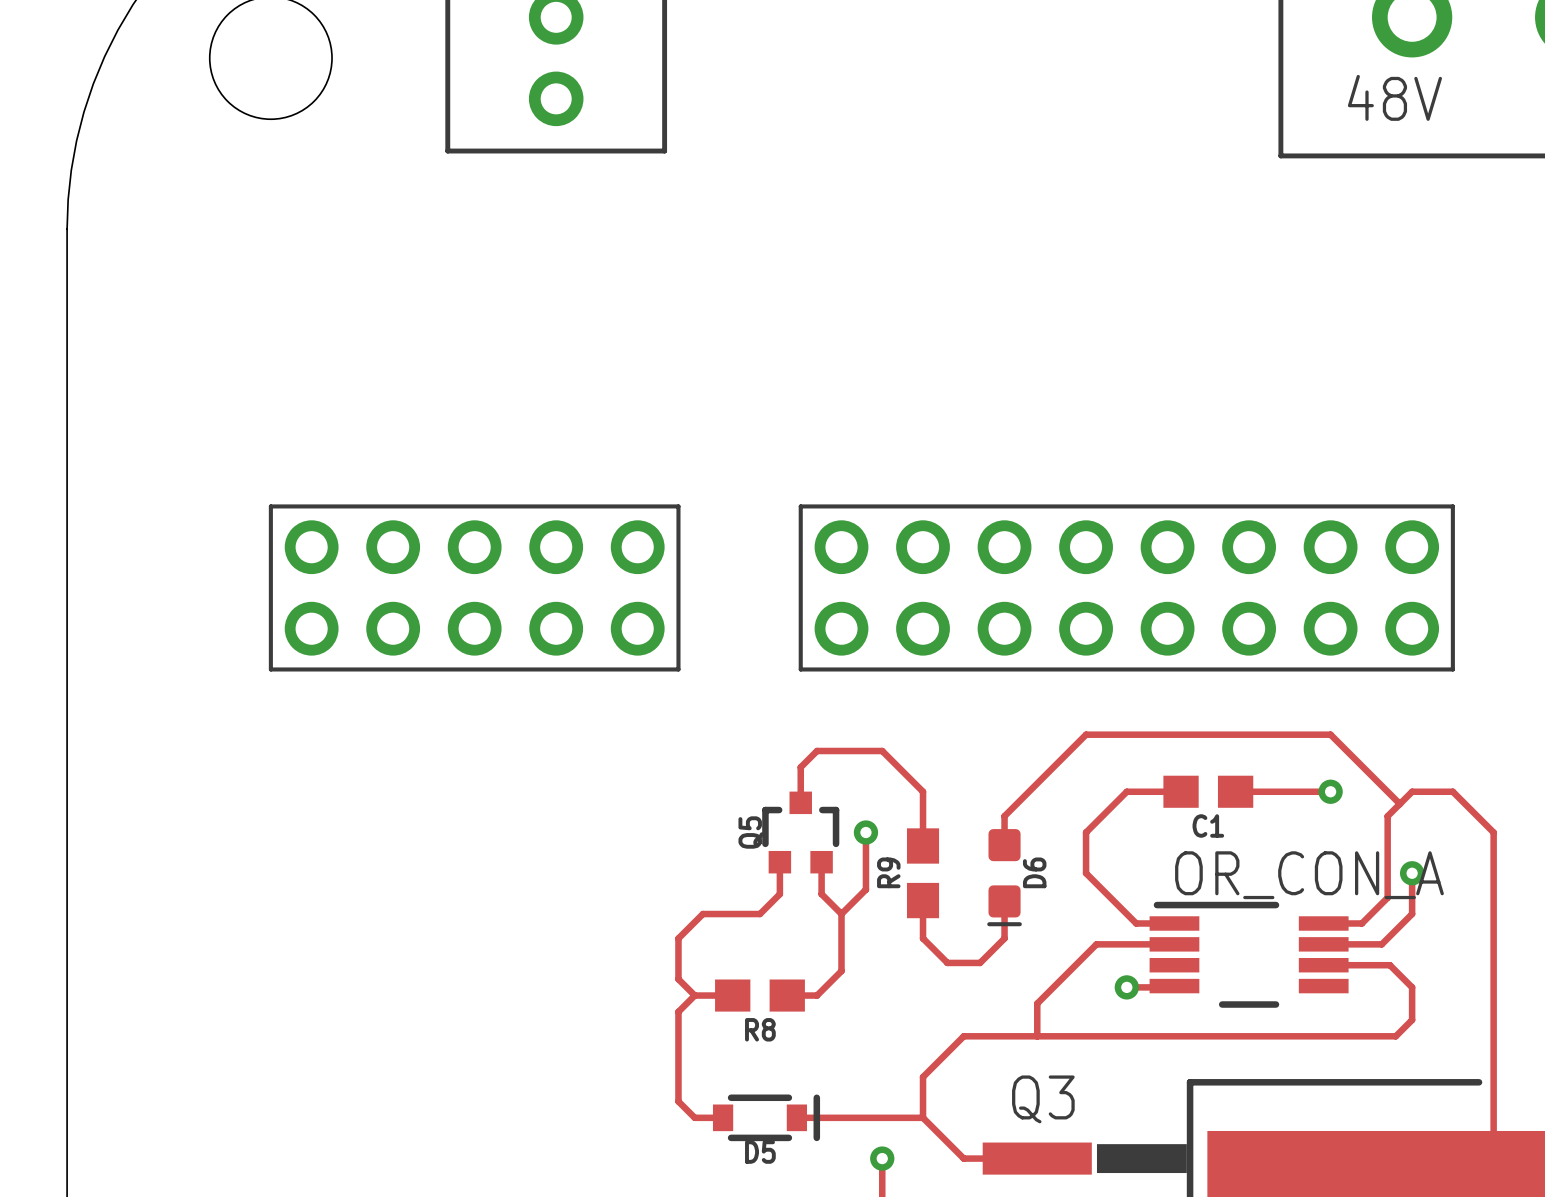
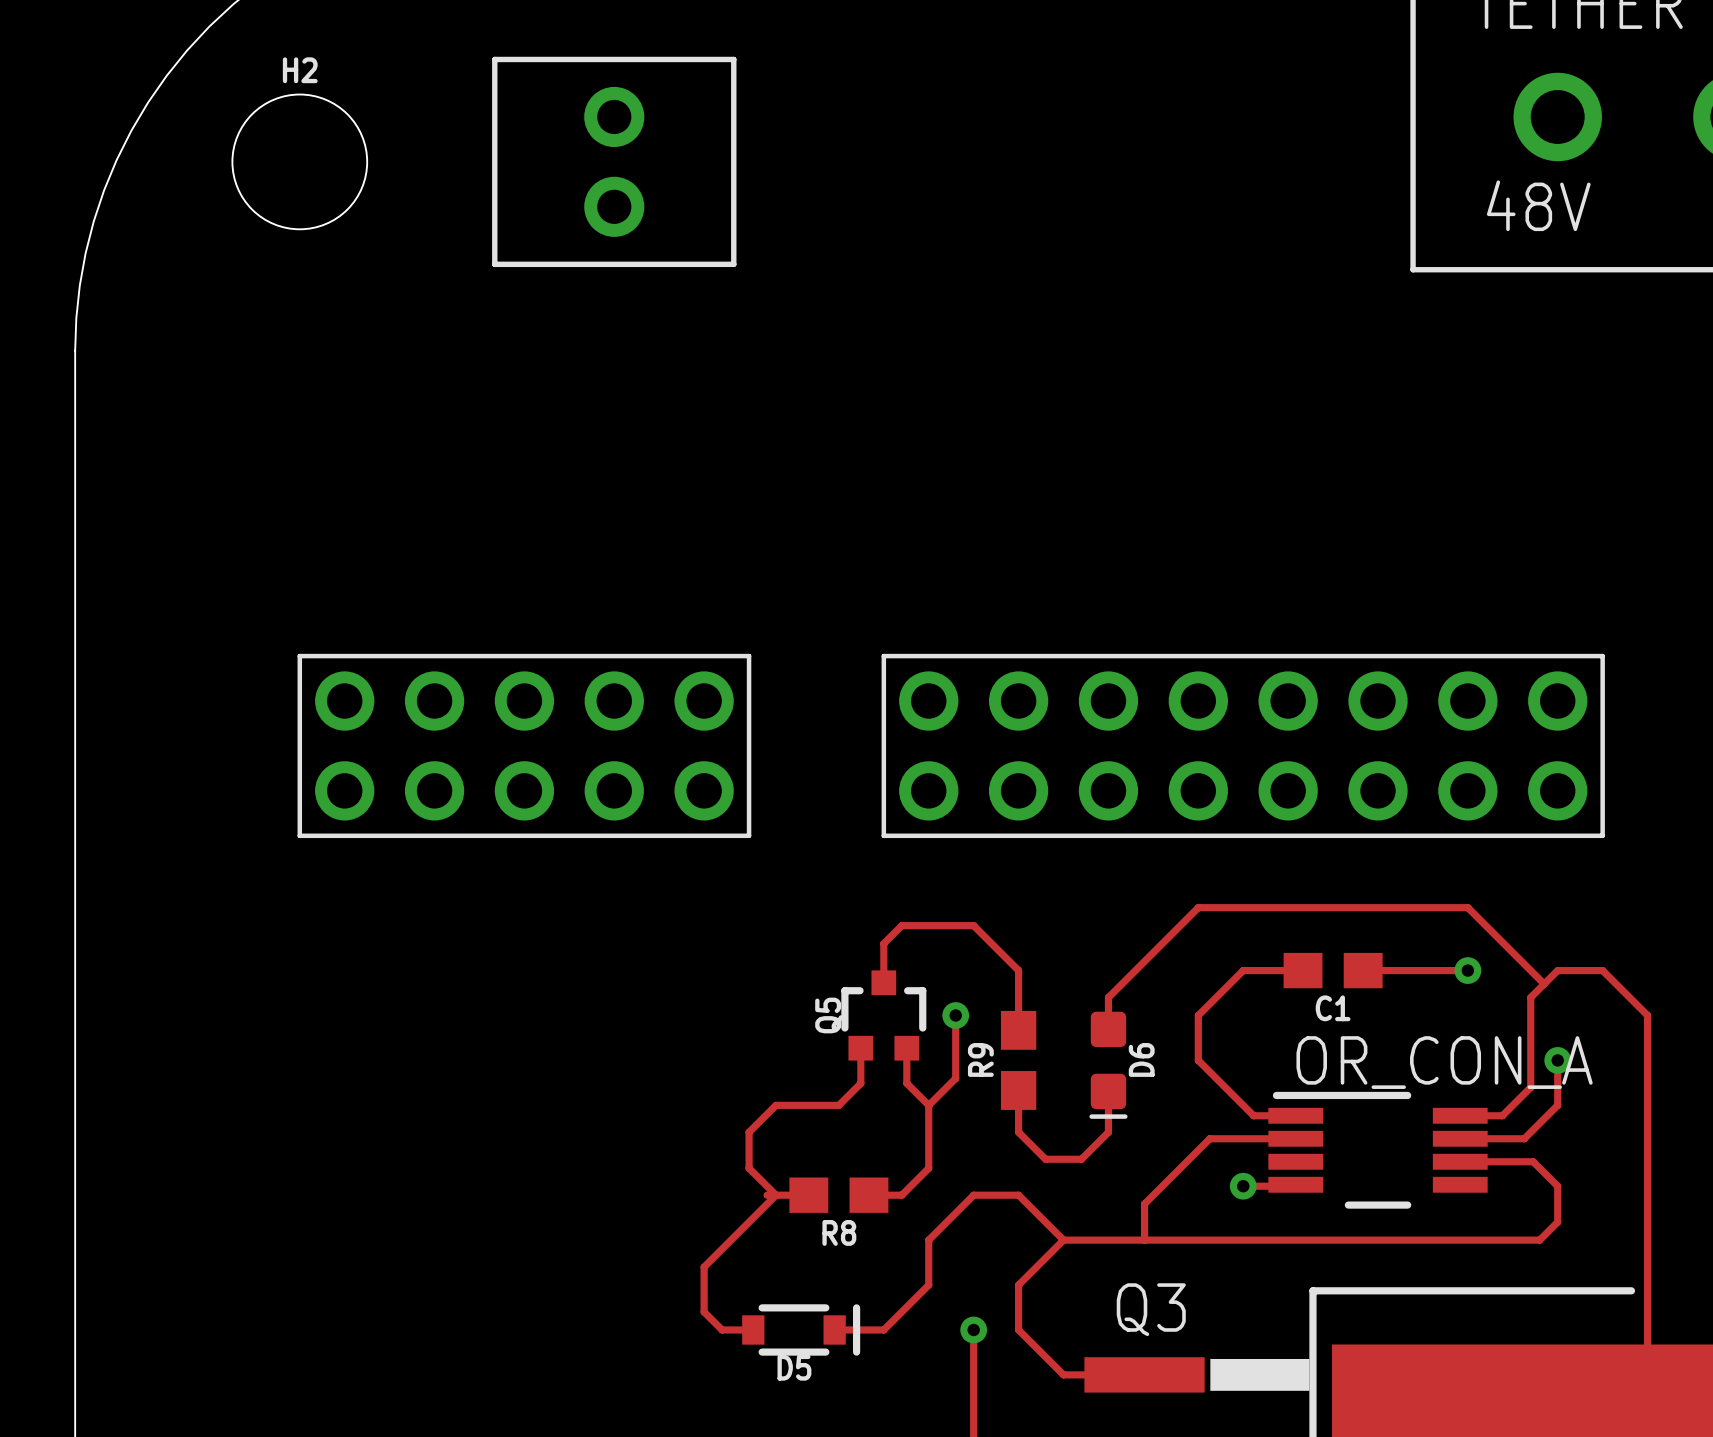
track: (678, 971) (678, 979) (694, 995) (678, 1011) (678, 1101) (694, 1117) (723, 1117) -> (749, 1168) (776, 1195) (704, 1267) (704, 1312) (722, 1329) (753, 1329)
track: none -> (834, 1329) (879, 1329)
D5 position: (766, 1117) -> (801, 1329)
track: (800, 1117) (923, 1117) -> (883, 1329) (928, 1285) (928, 1240) (973, 1195) (1018, 1195) (1063, 1240)
track: none -> (973, 1329) (973, 1374)
via position: (882, 1158) -> (973, 1329)

